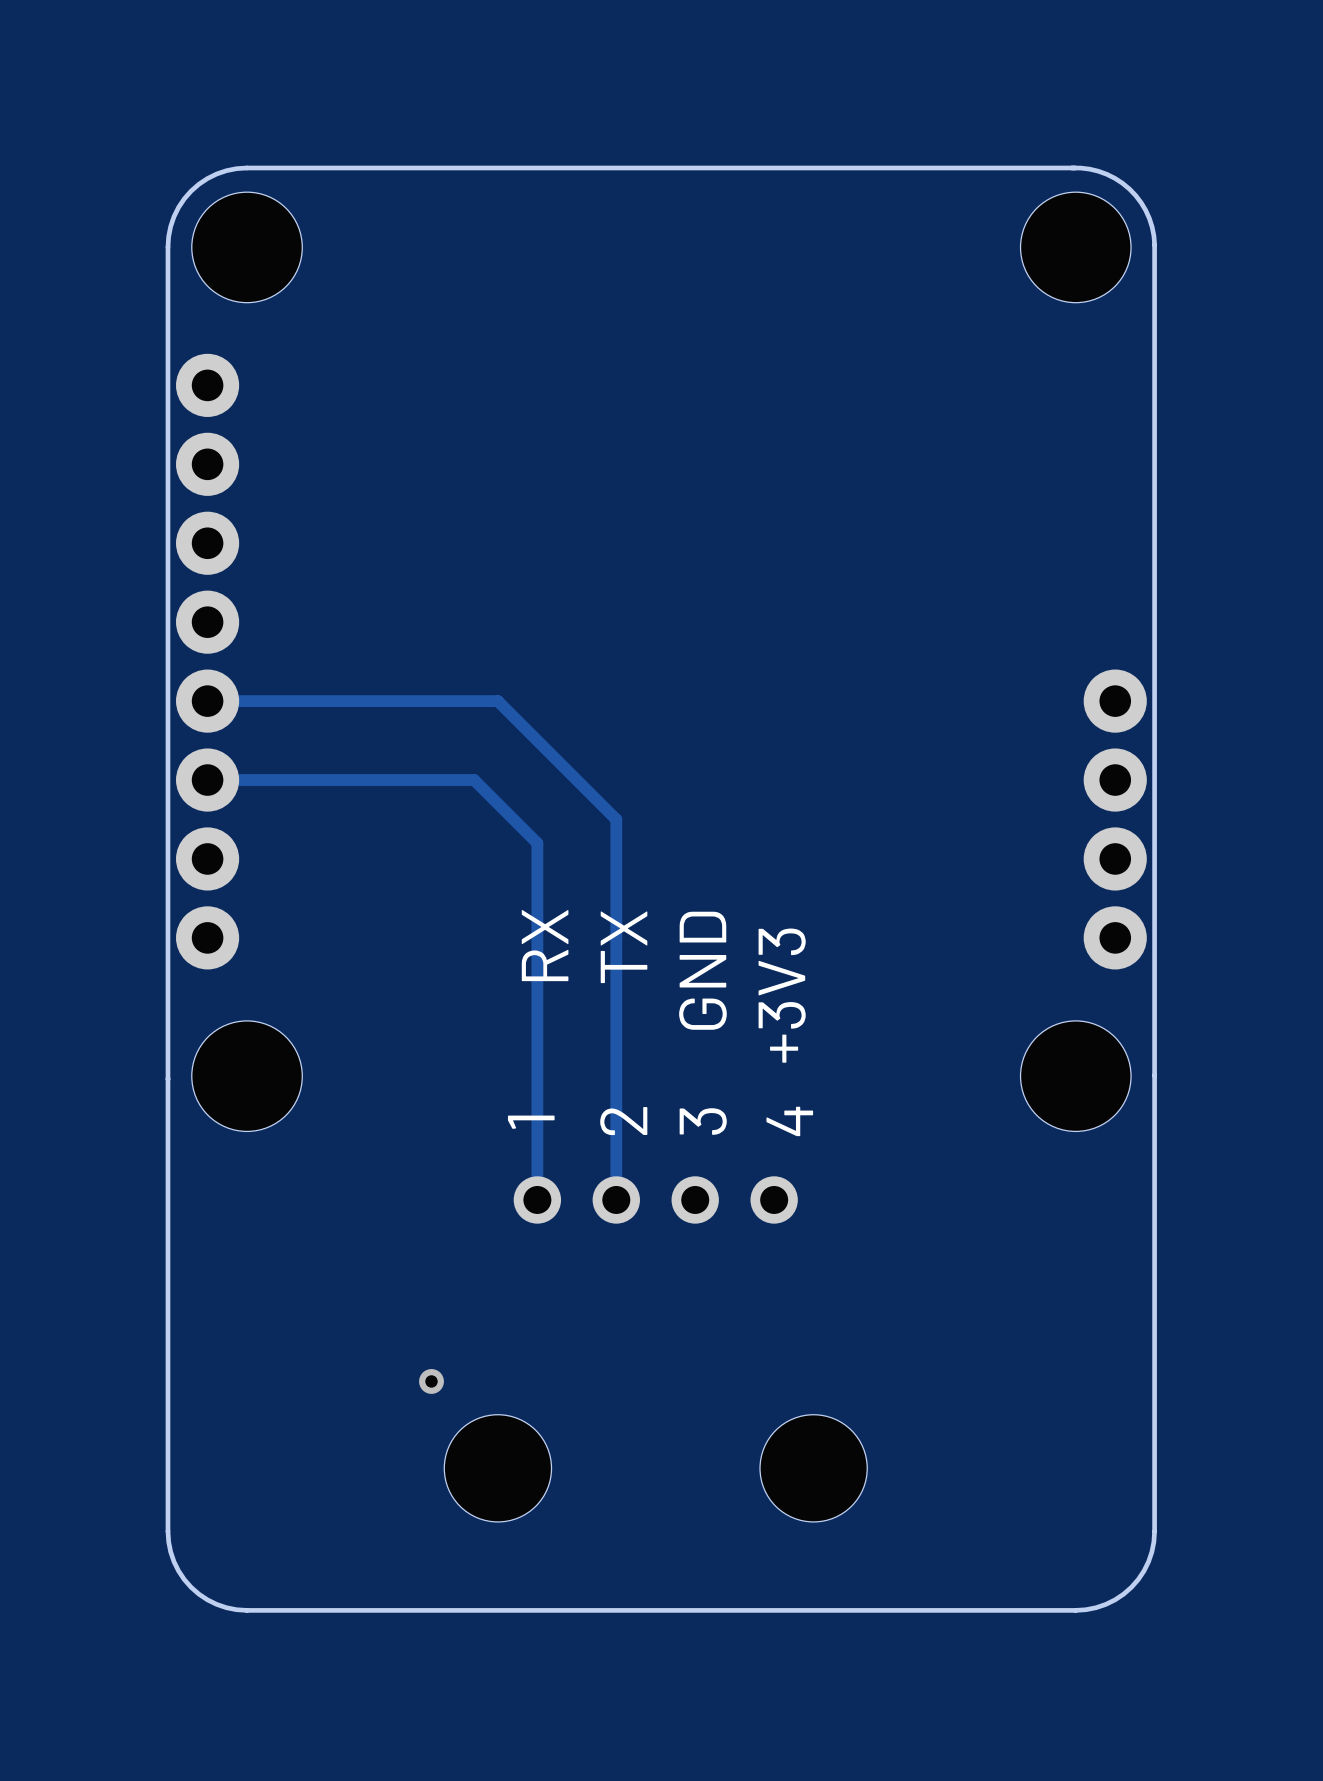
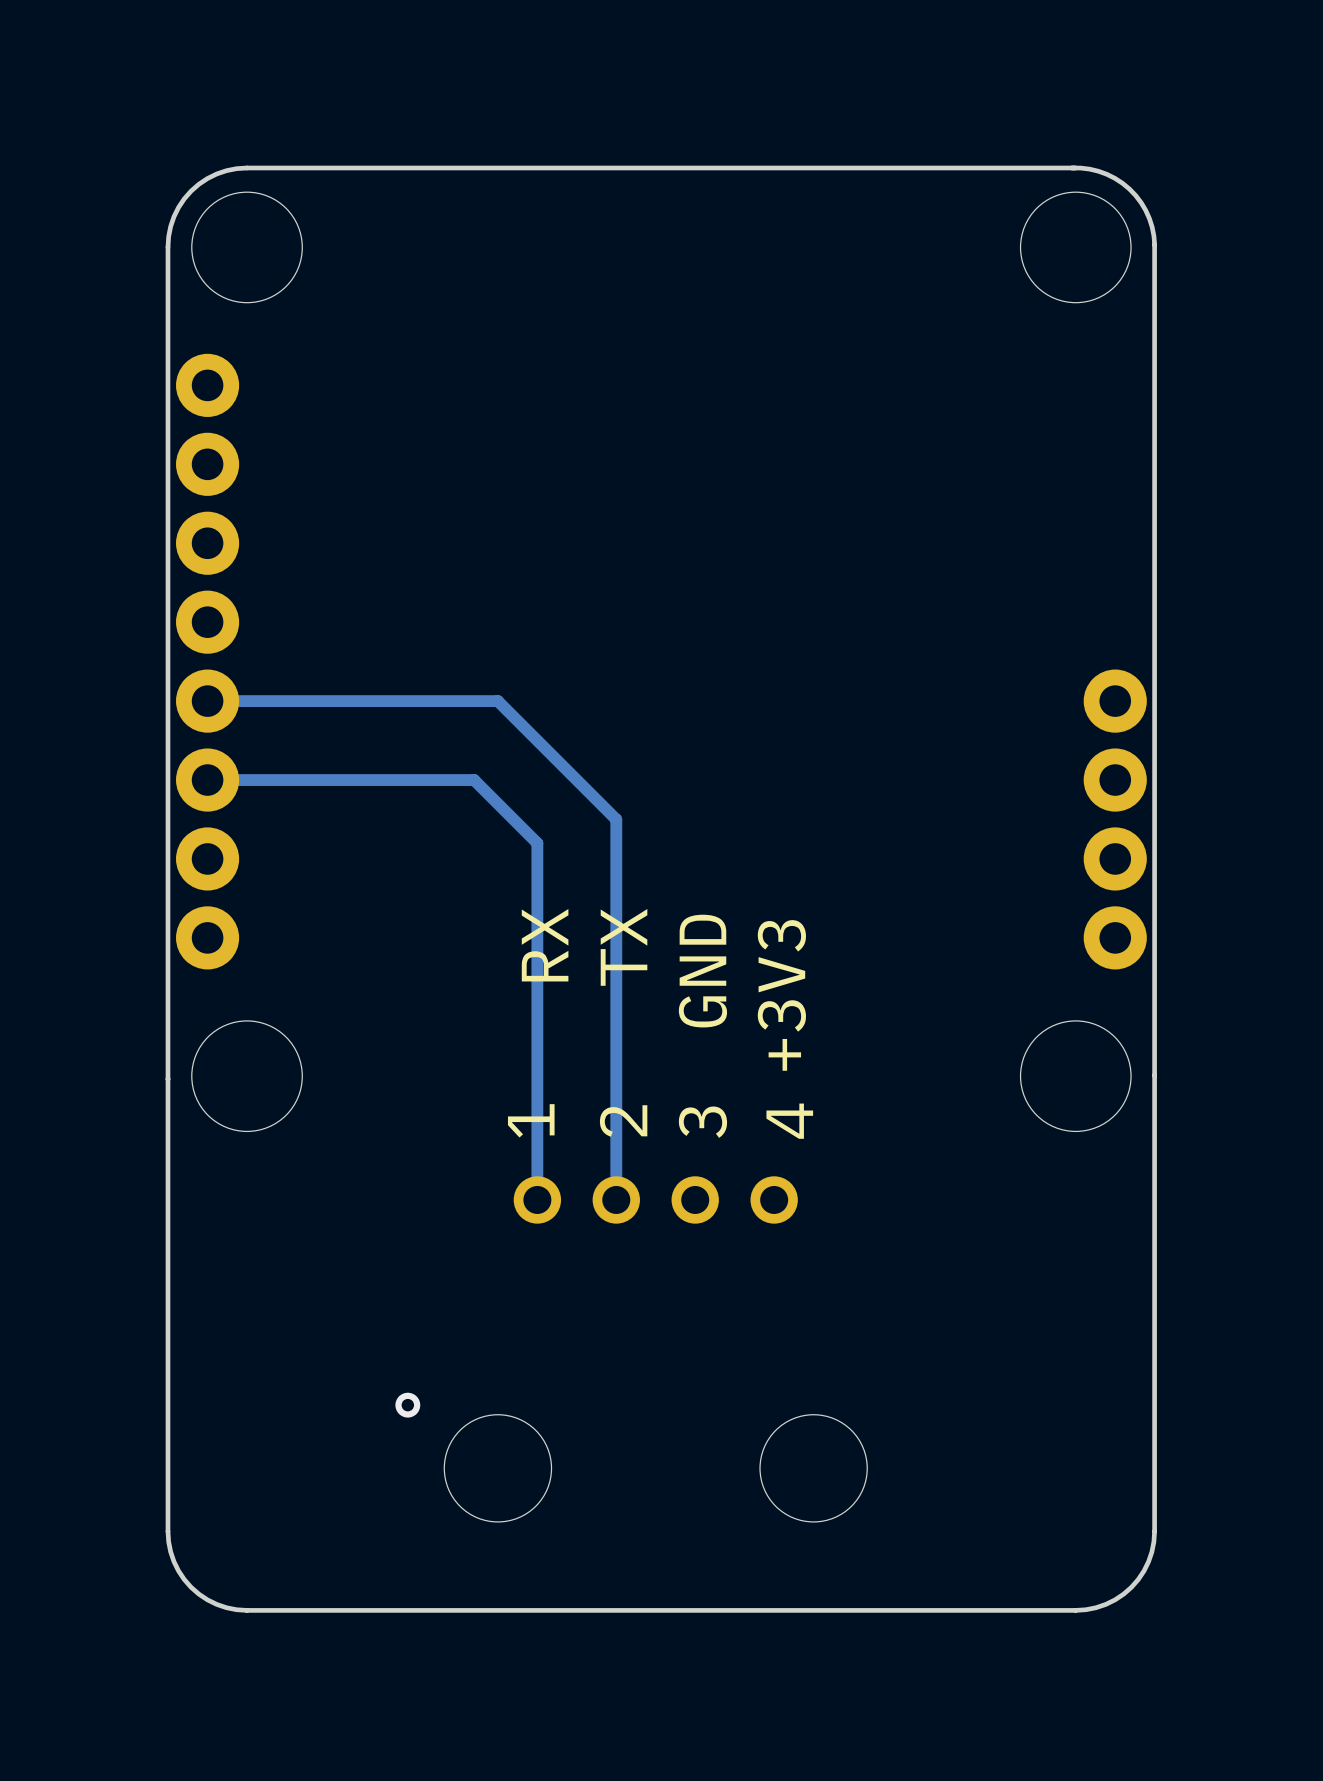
via position: (431, 1381) -> (407, 1405)

